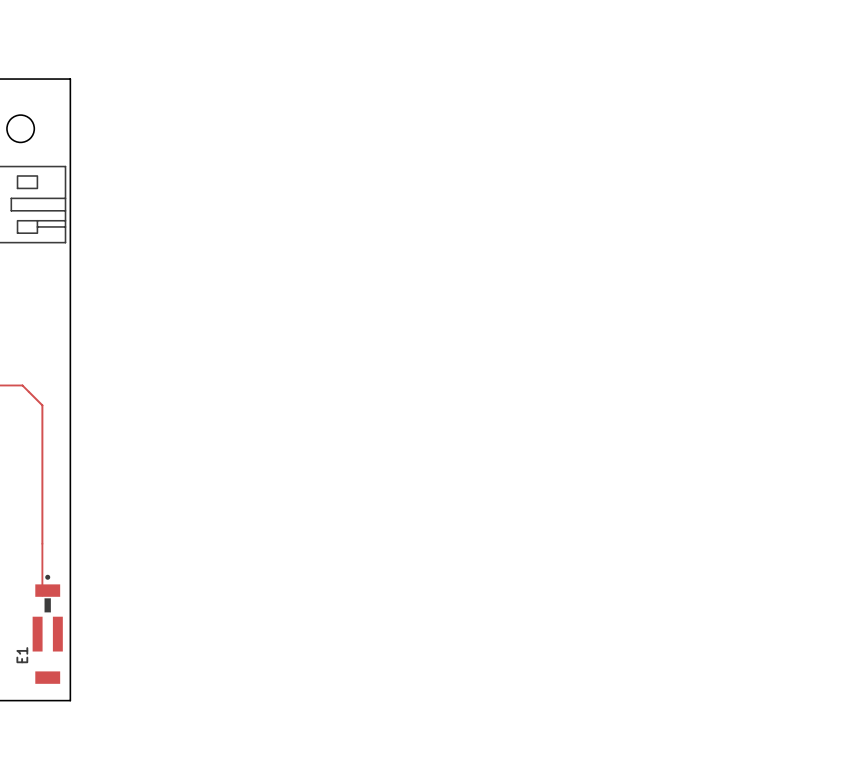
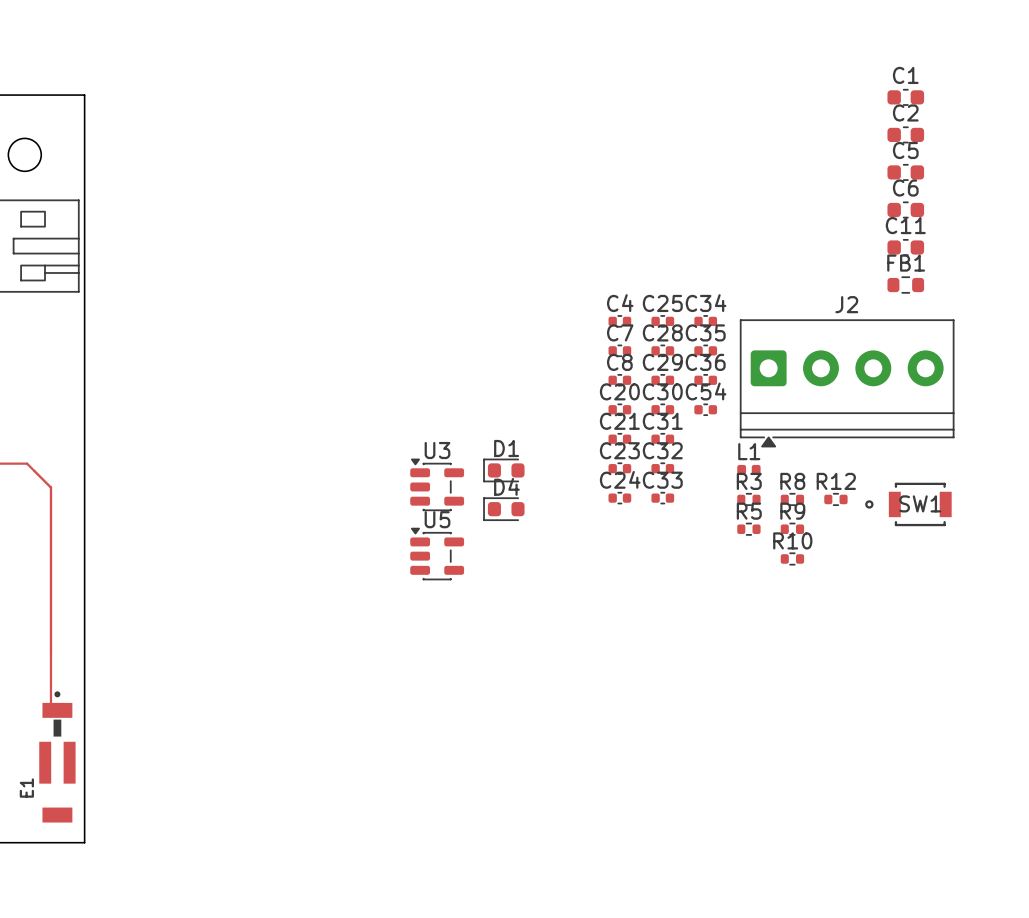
C1: none -> (905, 97)
C2: none -> (905, 134)
C5: none -> (905, 172)
C6: none -> (905, 209)
C11: none -> (905, 247)
FB1: none -> (905, 285)
C4: none -> (619, 321)
C25: none -> (662, 321)
C34: none -> (705, 321)
C7: none -> (619, 350)
C28: none -> (662, 350)
C35: none -> (705, 350)
C8: none -> (619, 380)
C29: none -> (662, 380)
C36: none -> (705, 380)
J2: none -> (847, 383)
C20: none -> (619, 409)
C30: none -> (662, 409)
C54: none -> (705, 409)
C21: none -> (619, 439)
C31: none -> (662, 439)
C23: none -> (619, 468)
C32: none -> (662, 468)
L1: none -> (748, 469)
D1: none -> (503, 470)
U3: none -> (437, 484)
C24: none -> (619, 498)
C33: none -> (662, 498)
R3: none -> (748, 499)
R8: none -> (792, 499)
R12: none -> (835, 499)
SW1: none -> (908, 504)
D4: none -> (503, 509)
R5: none -> (748, 529)
R9: none -> (792, 529)
U5: none -> (437, 554)
R10: none -> (792, 558)

